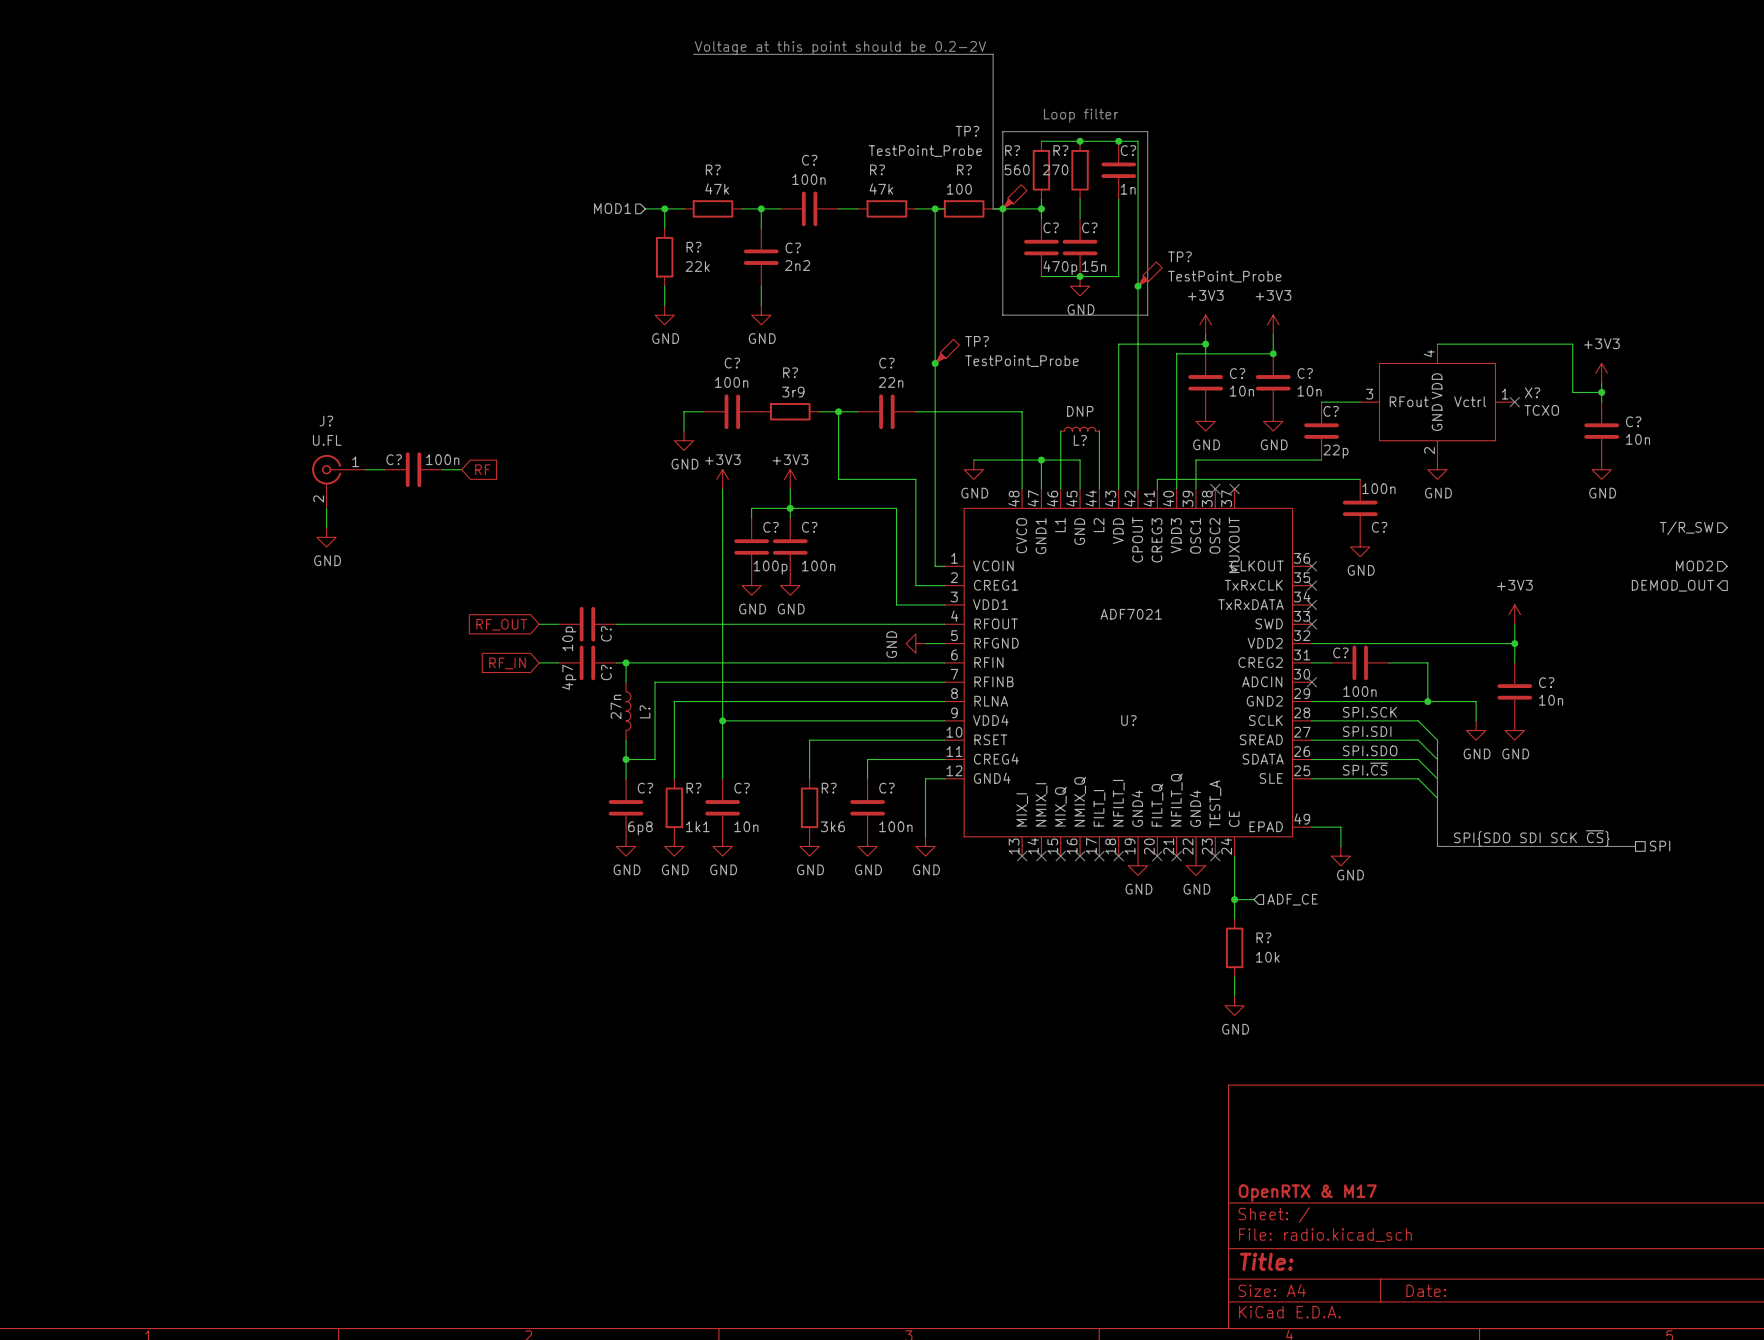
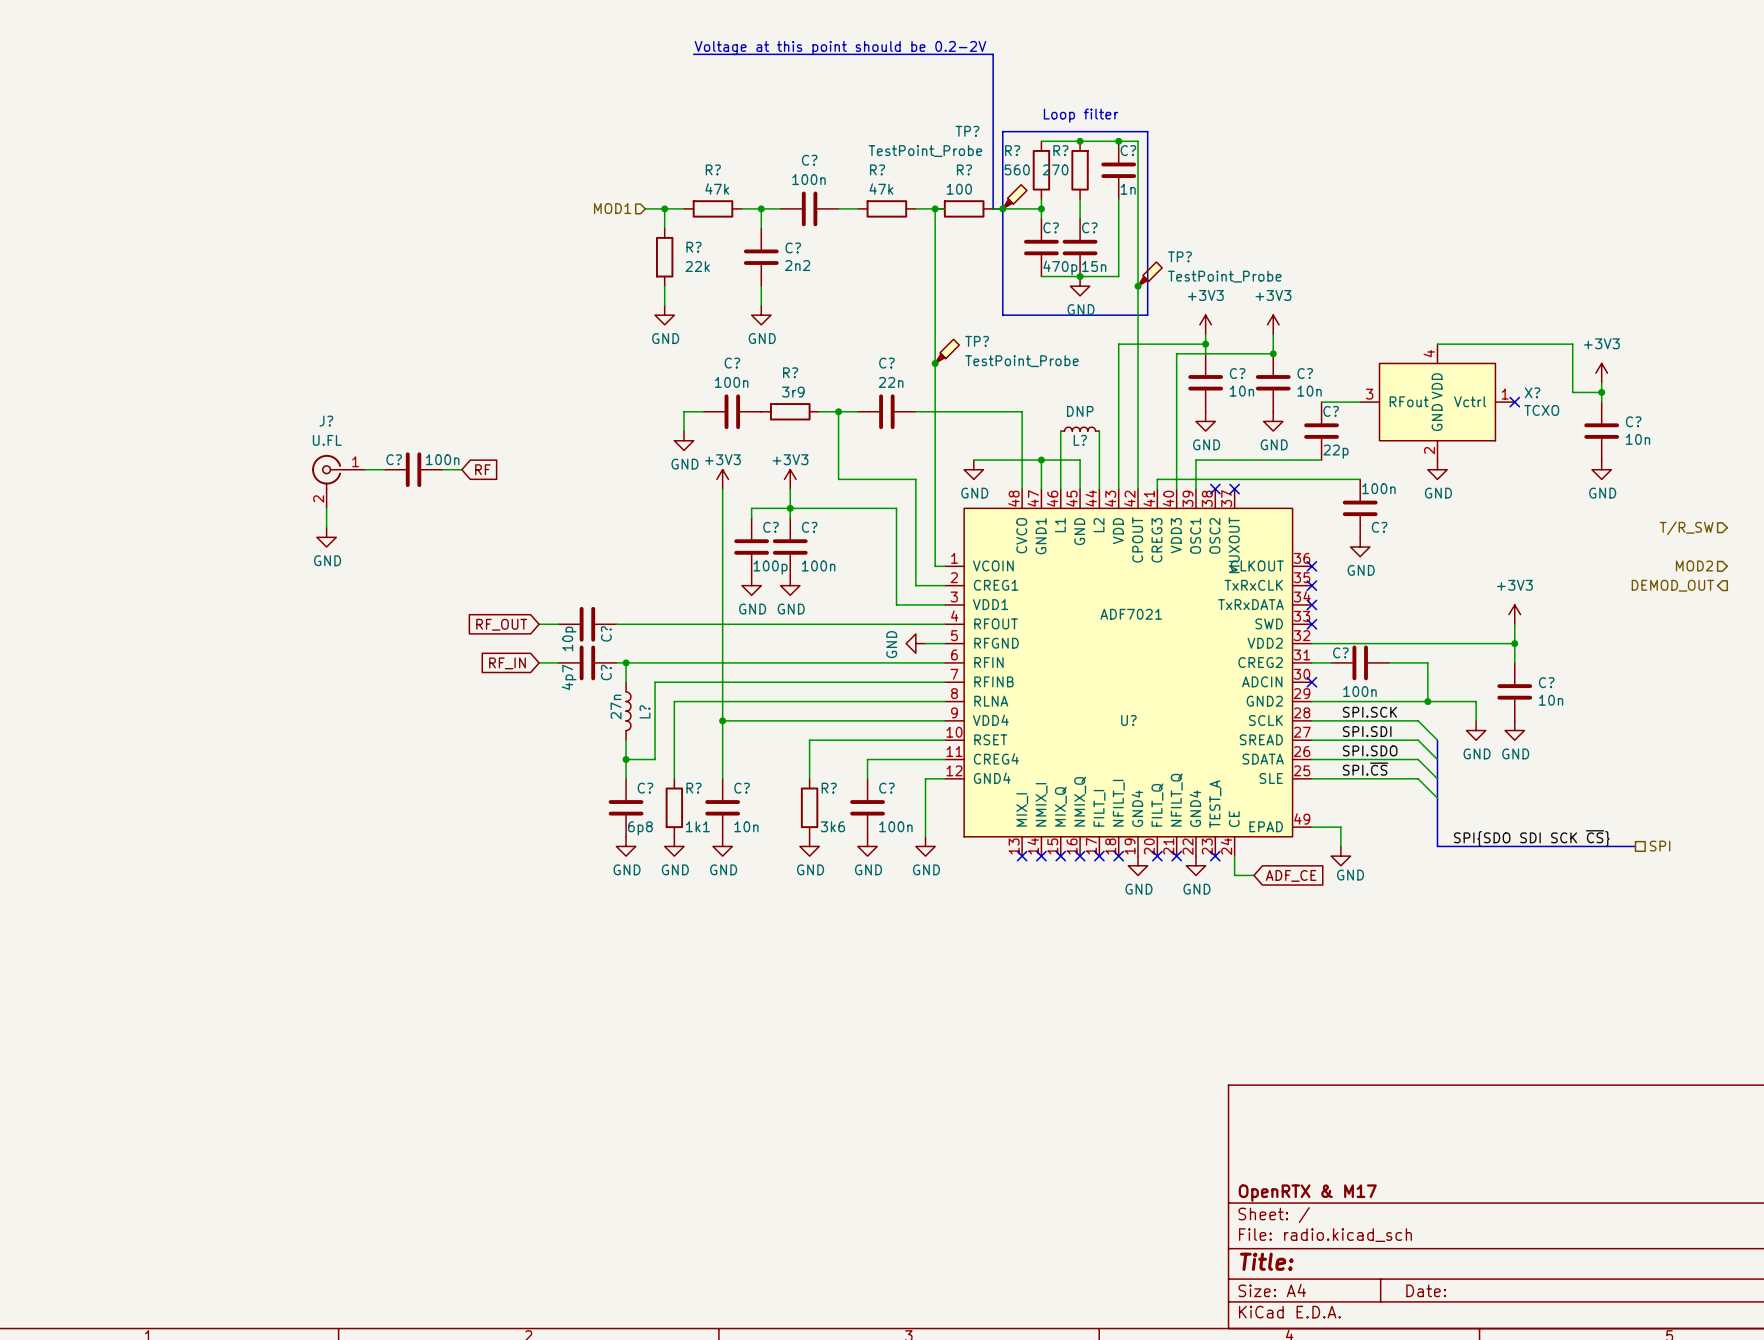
wire: (1234, 875) (1234, 918) -> (1234, 875) (1253, 875)
global label: none -> ADF_CE (1291, 875)
wire: (1234, 899) (1253, 899) -> none
junction: (1234, 899) -> none
hierarchical label: ADF_CE (1292, 899) -> none
R?: 10k (1234, 947) -> none
wire: (1234, 976) (1234, 996) -> none
power symbol: GND (1234, 1005) -> none

